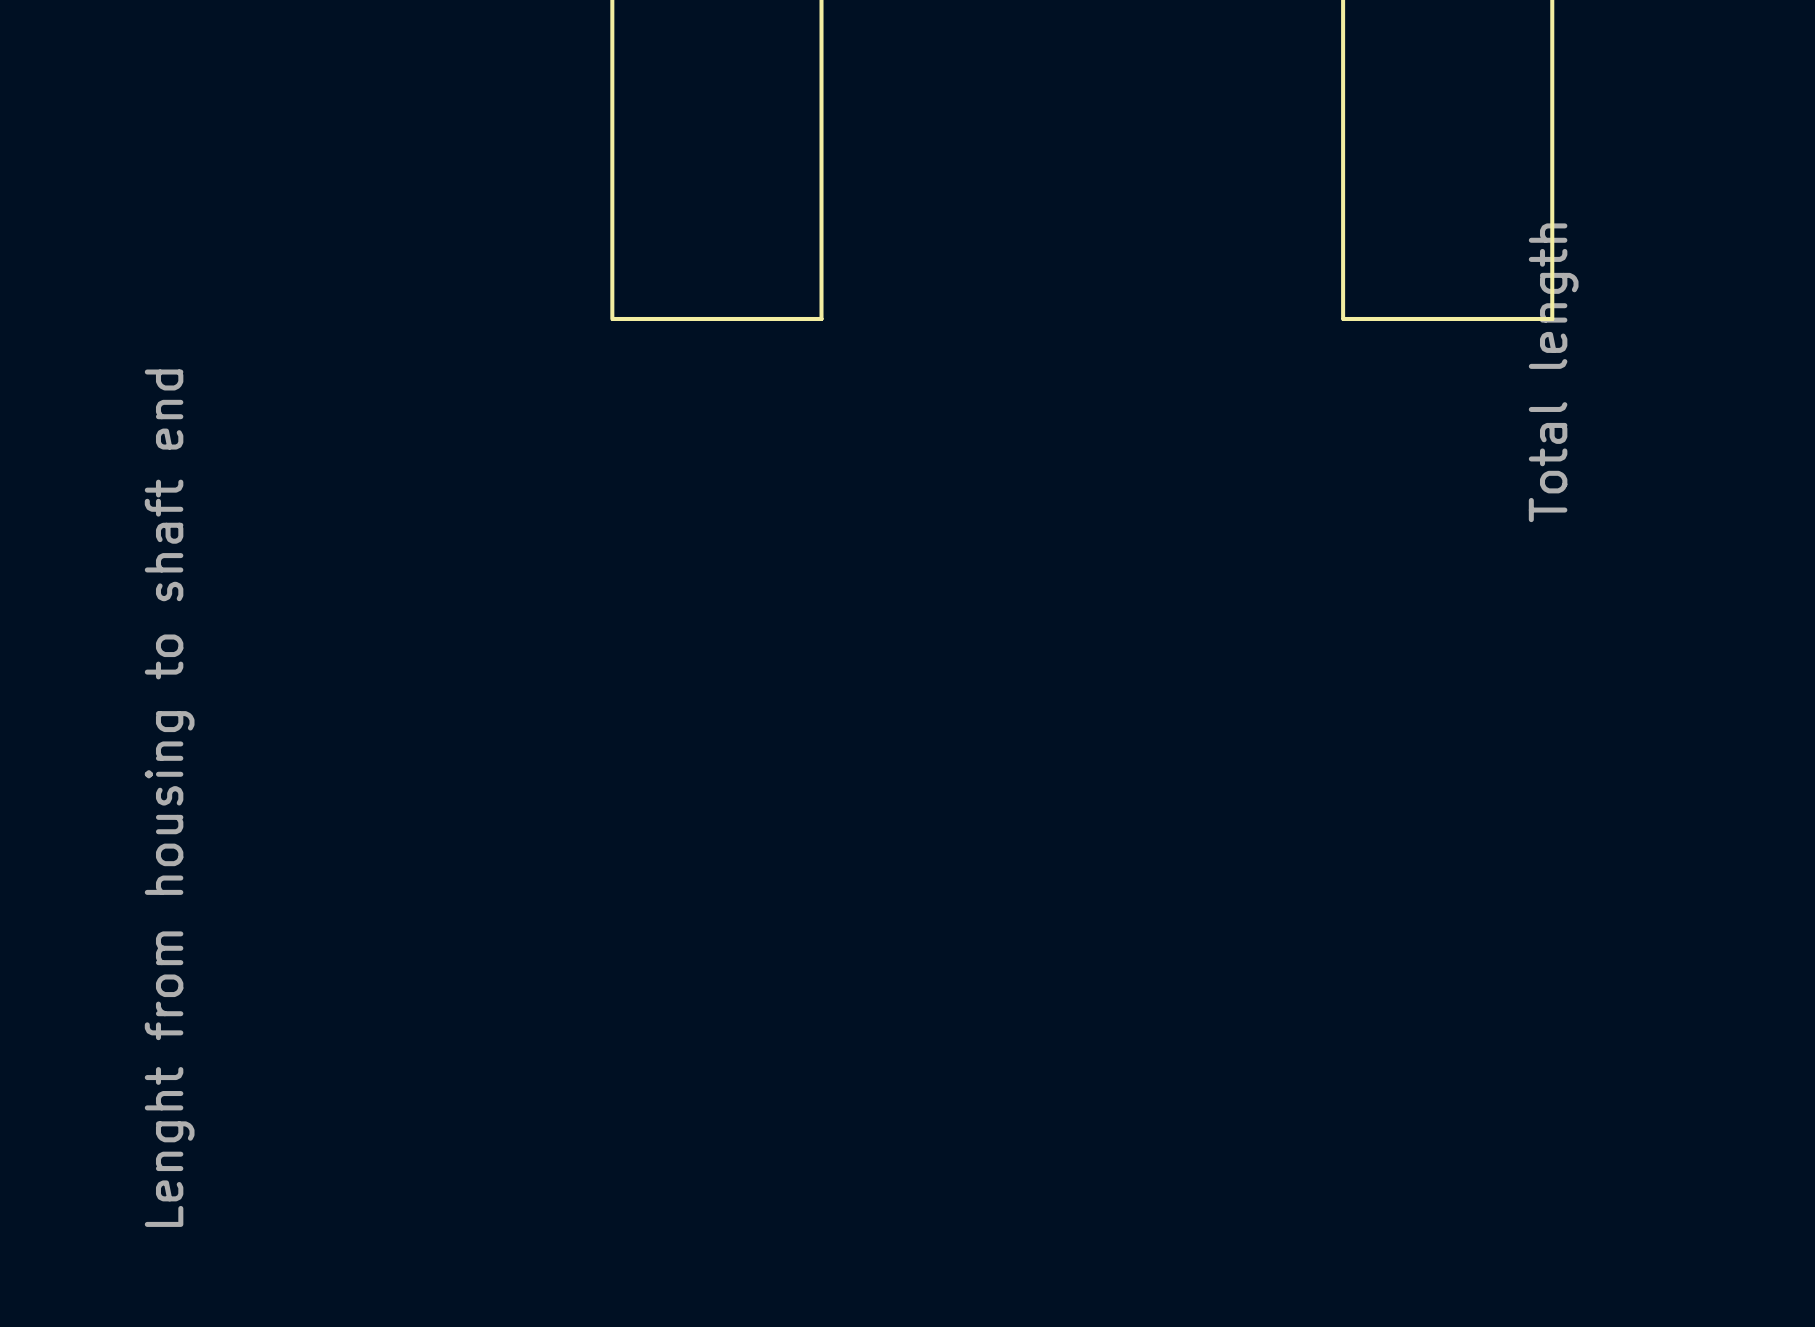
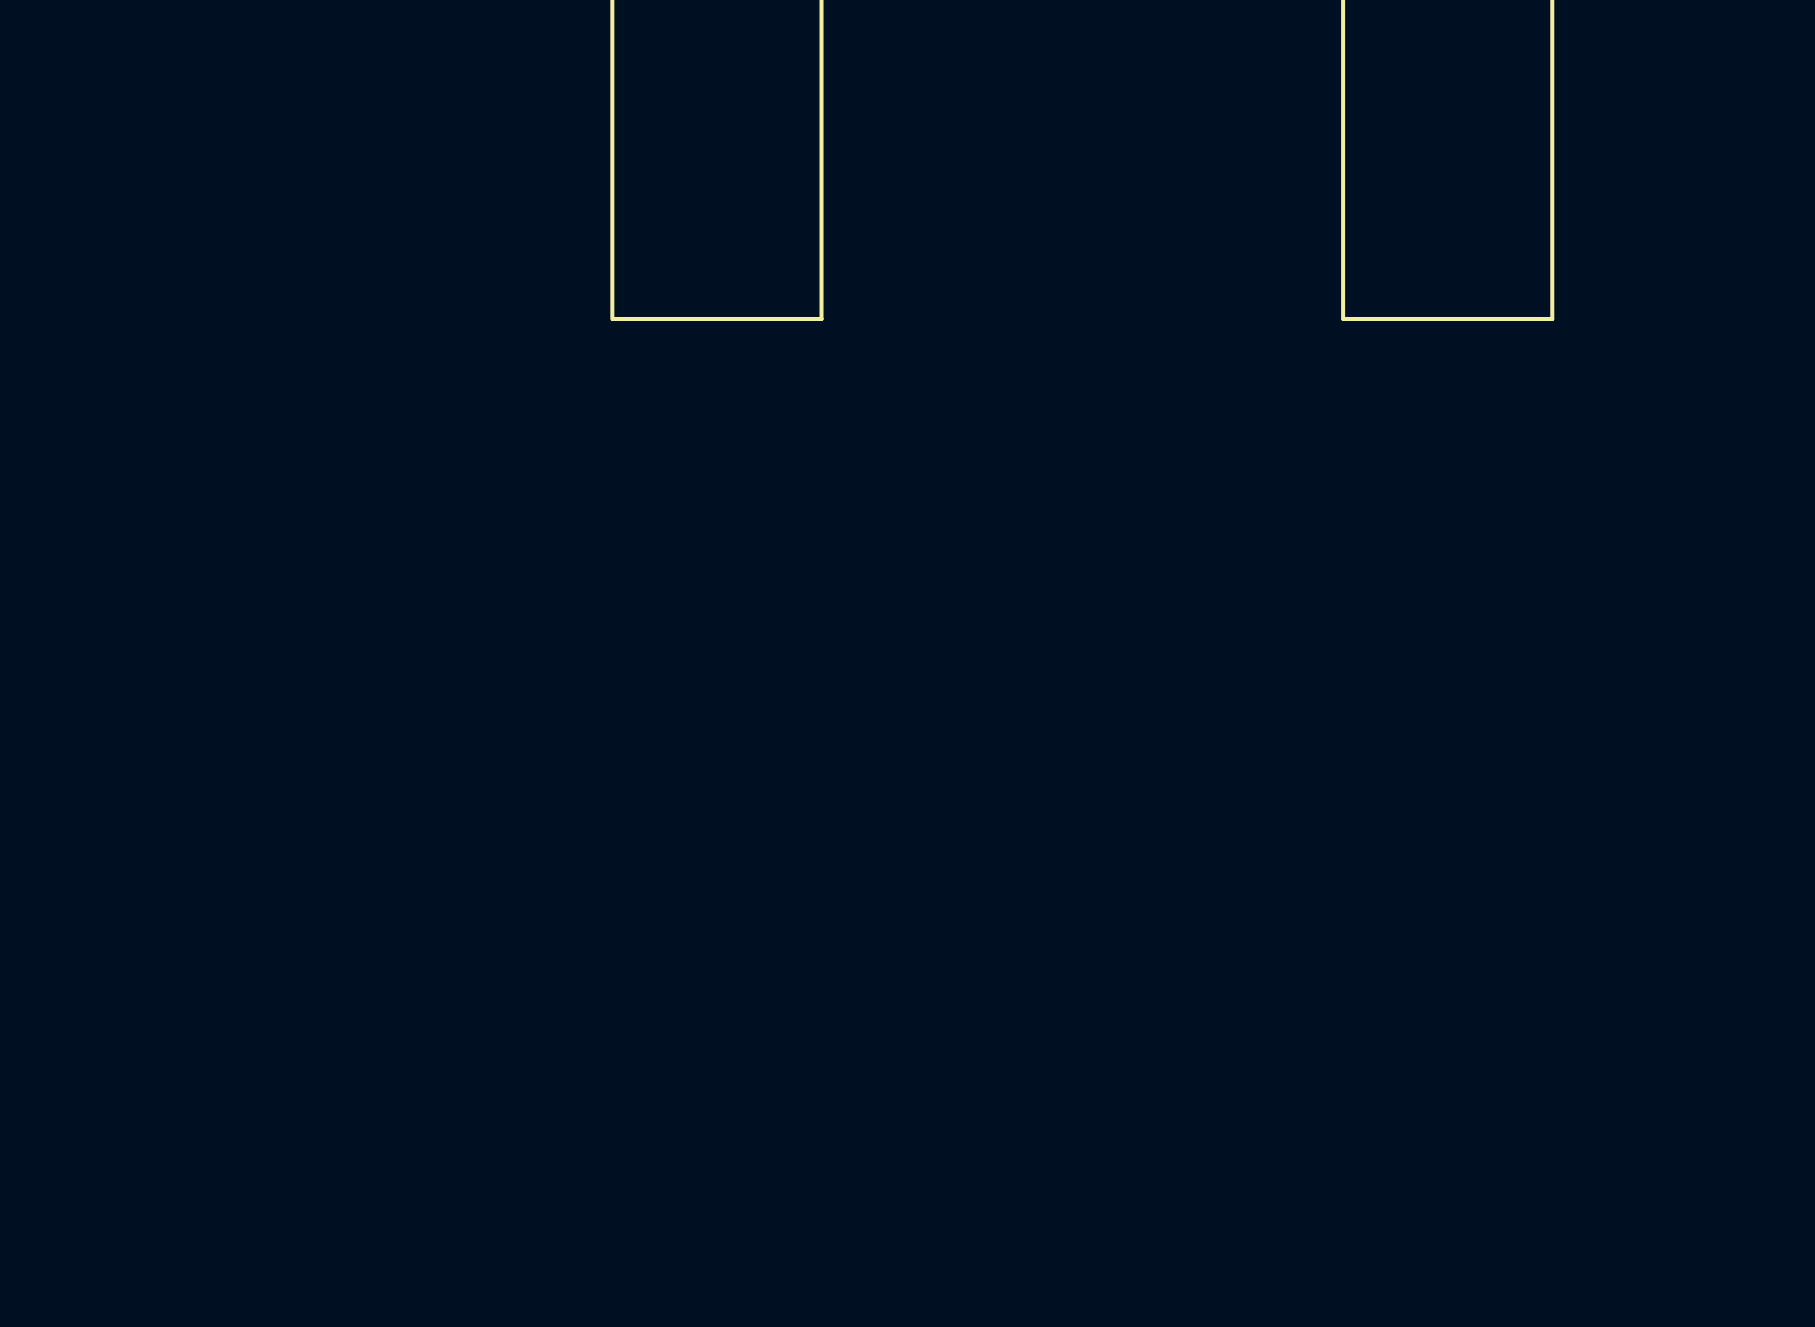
text: Total length (1553, 372) -> none
text: Lenght from housing to shaft end (169, 798) -> none

